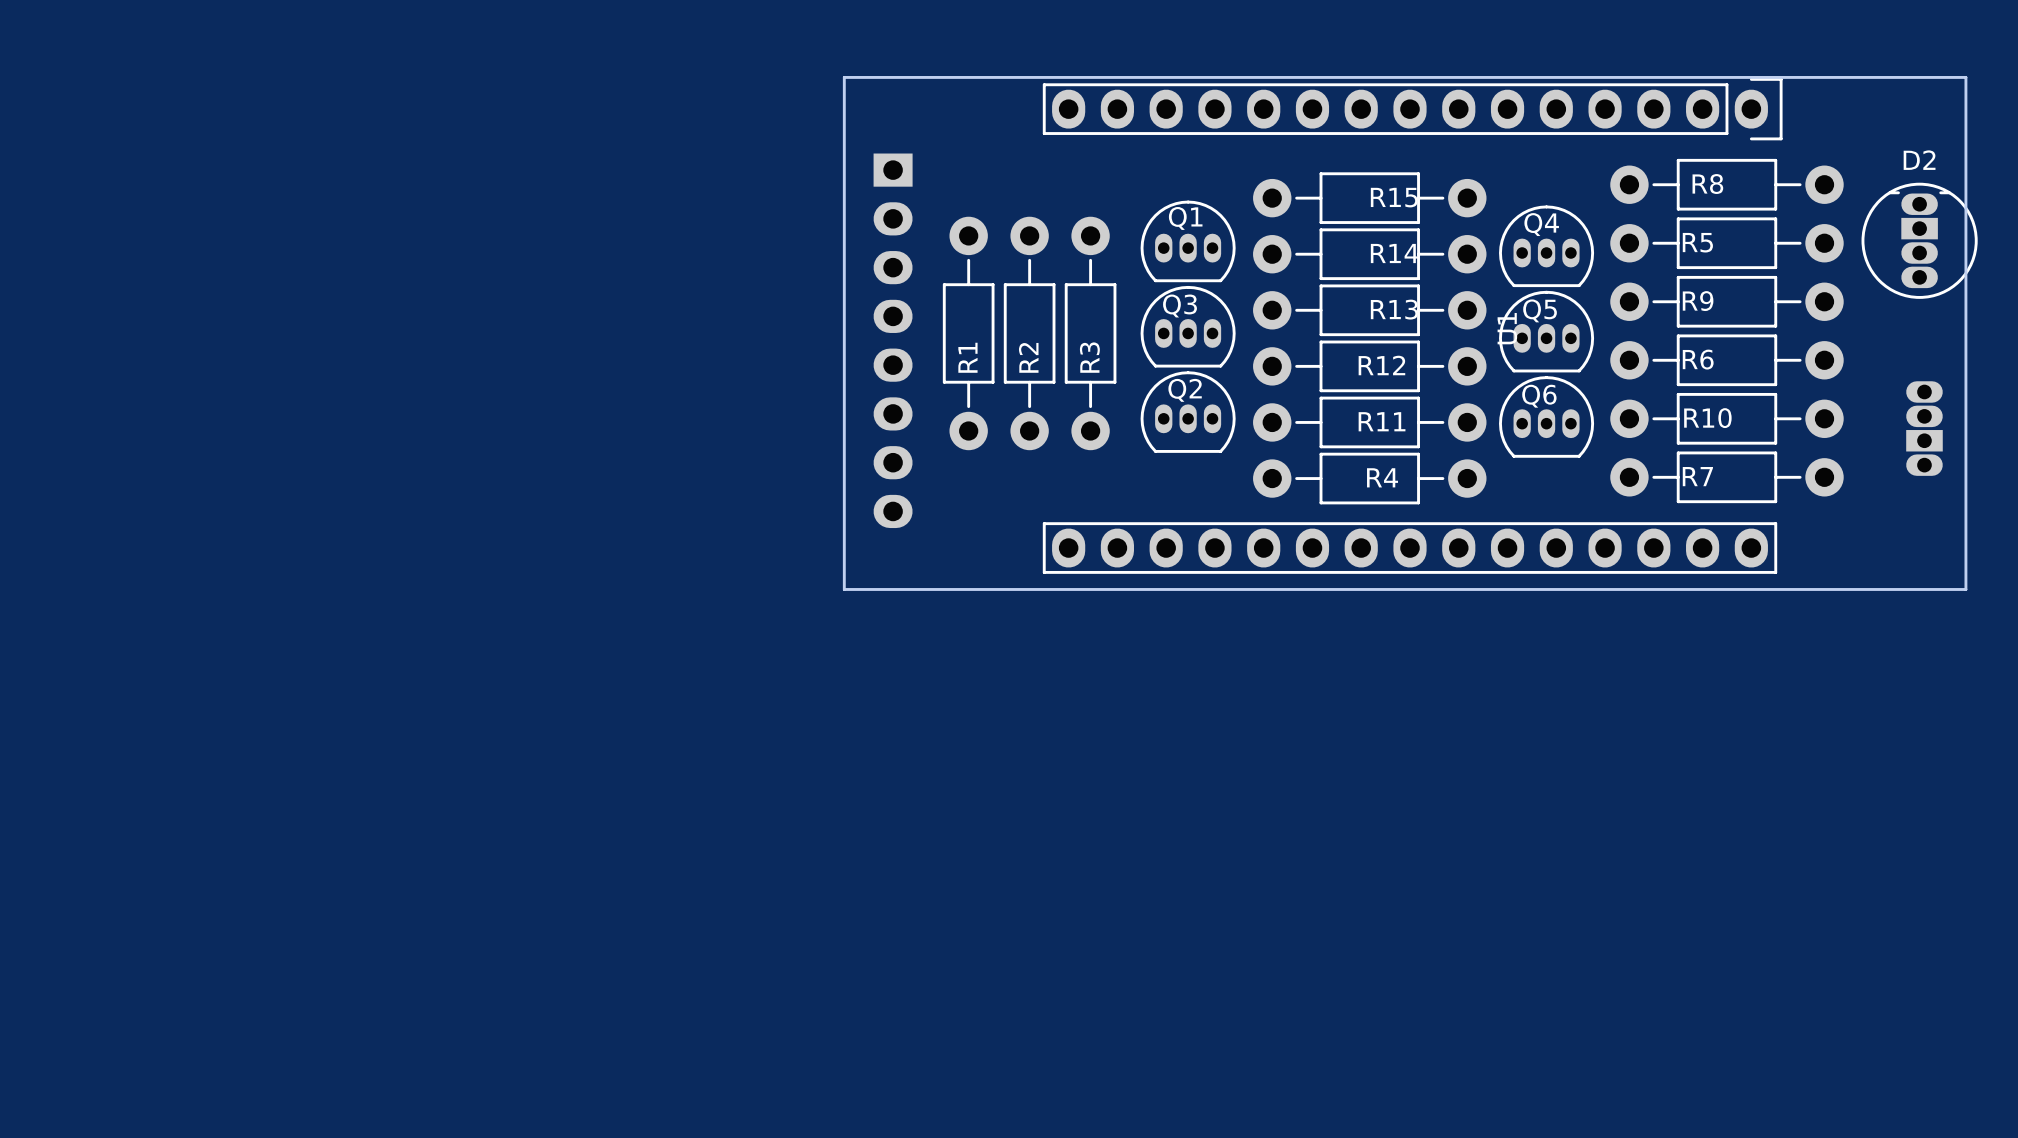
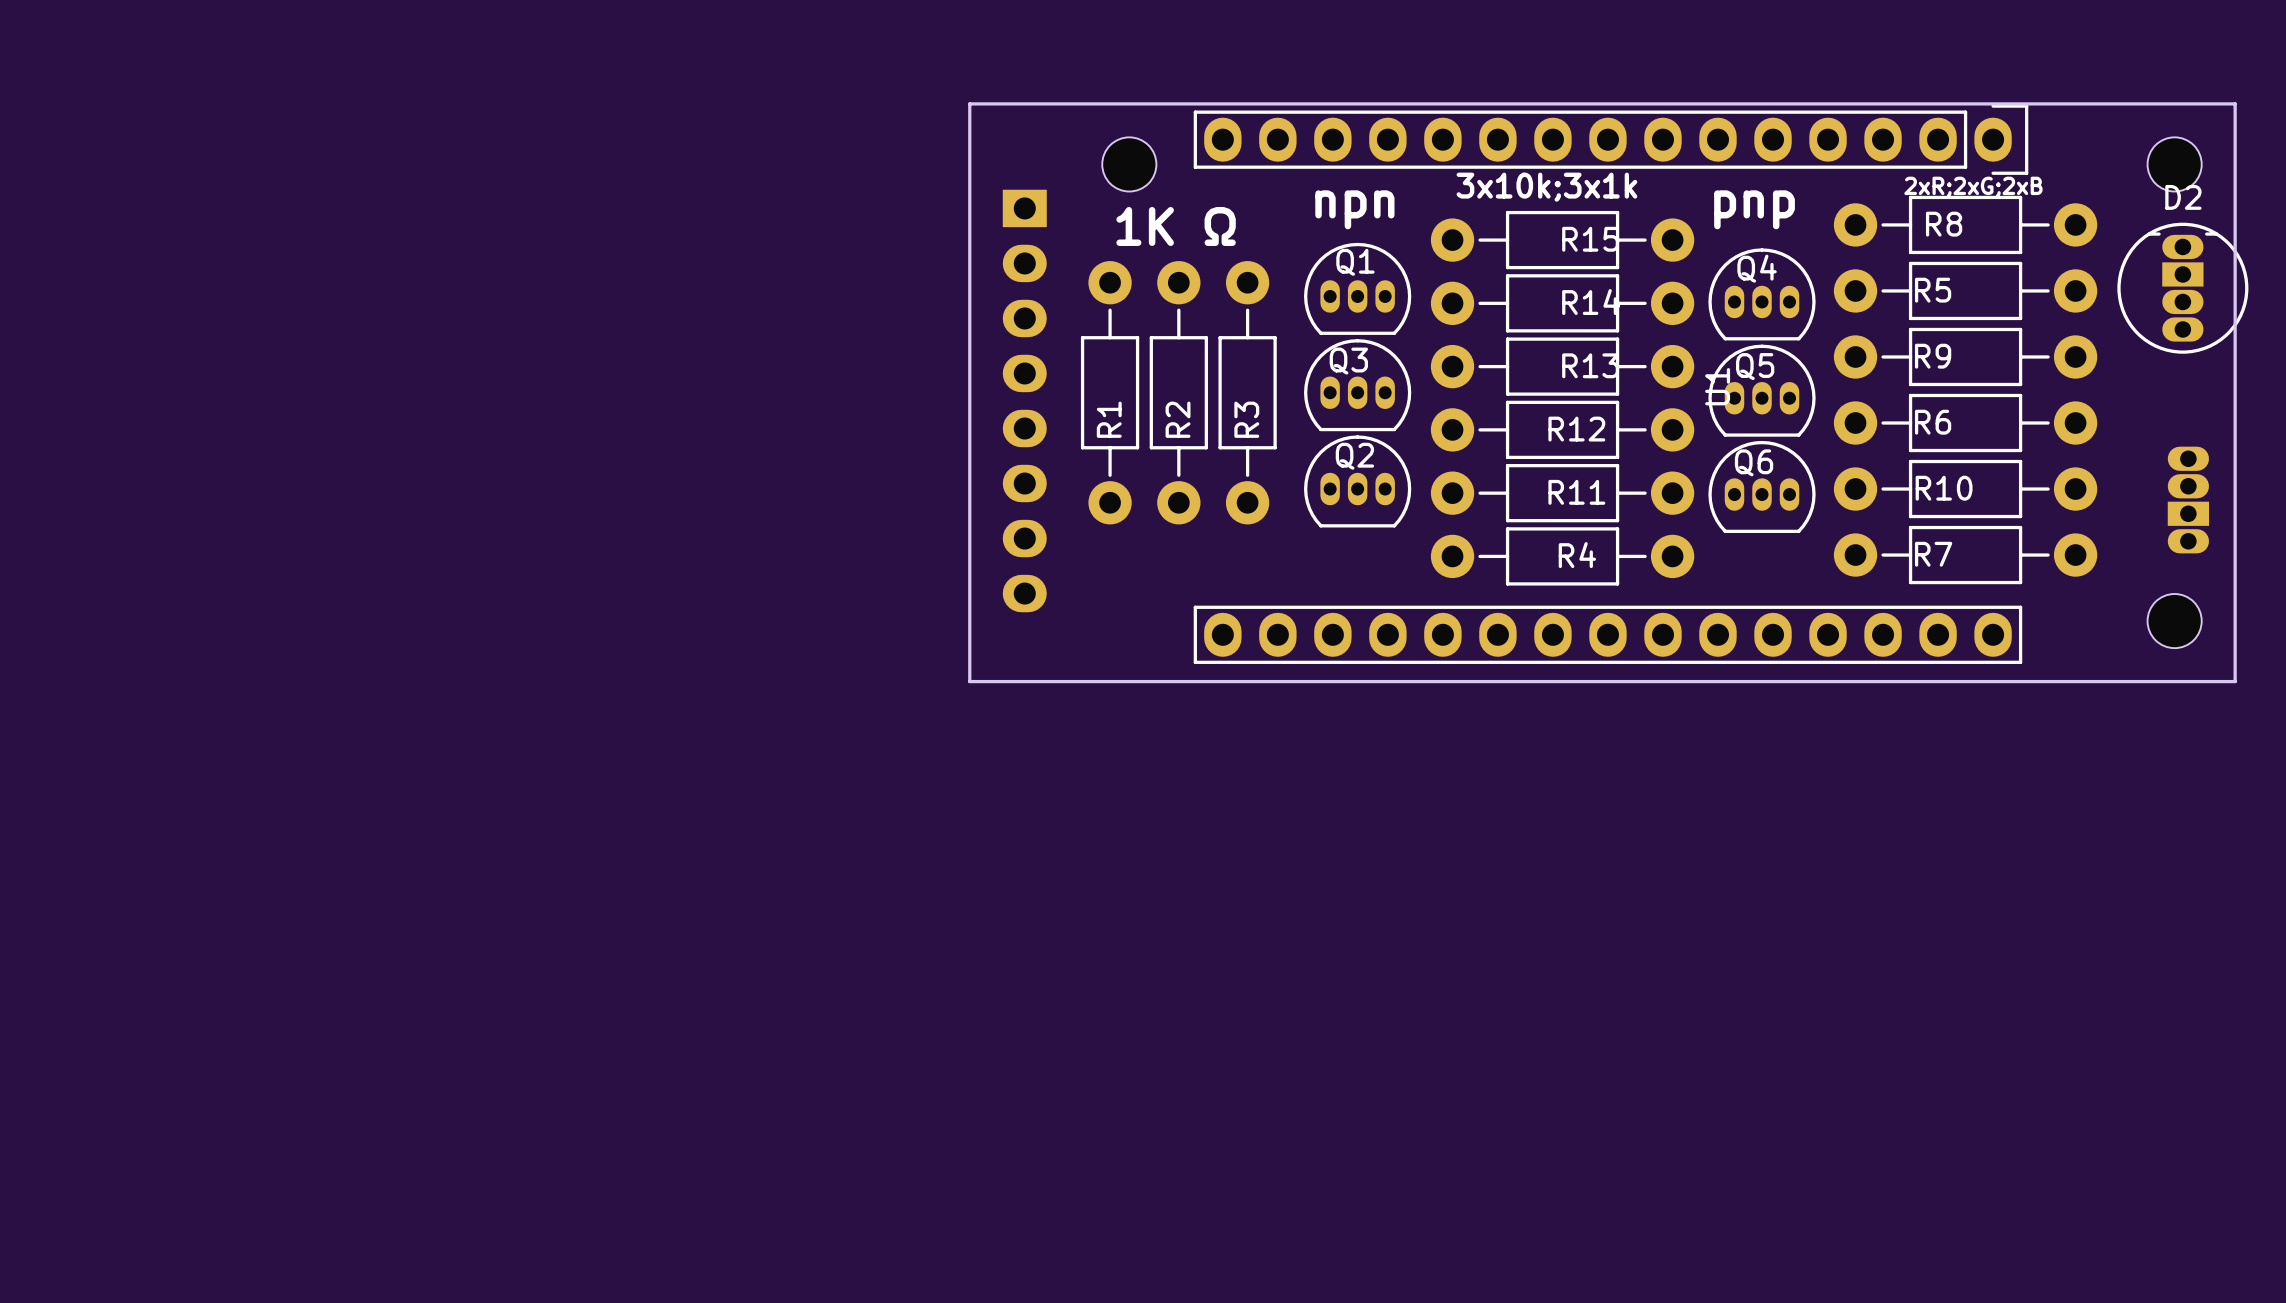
part: none -> (1129, 164)
part: none -> (2174, 164)
text: none -> 3x10k;3x1k (1546, 187)
text: none -> 2xR;2xG;2xB (1973, 186)
text: none -> npn (1354, 209)
text: none -> pnp (1754, 209)
text: none -> 1K Ω (1176, 226)
part: none -> (2174, 621)

